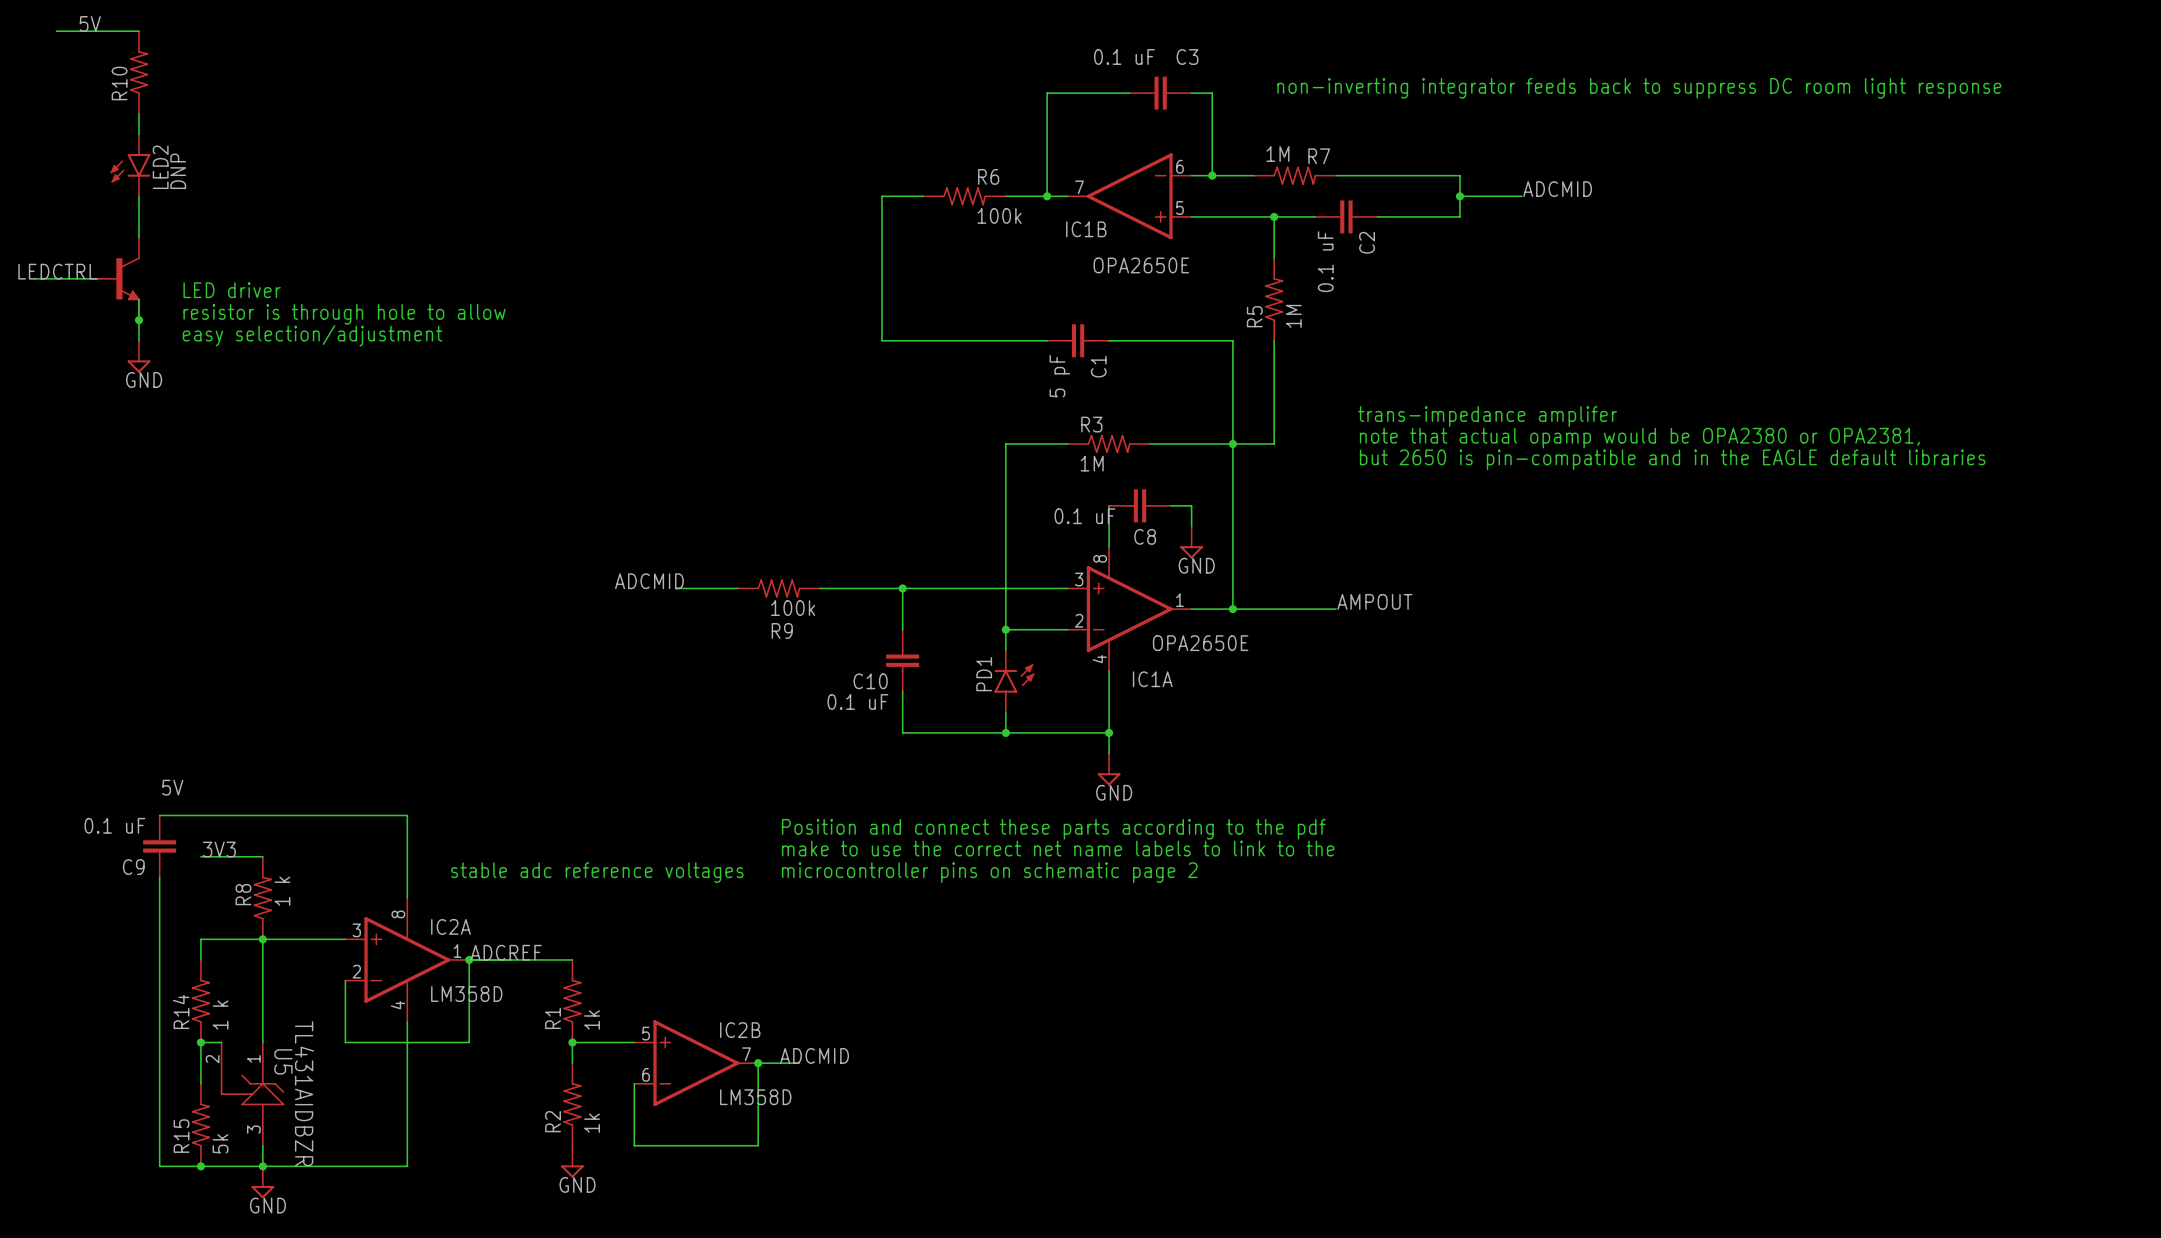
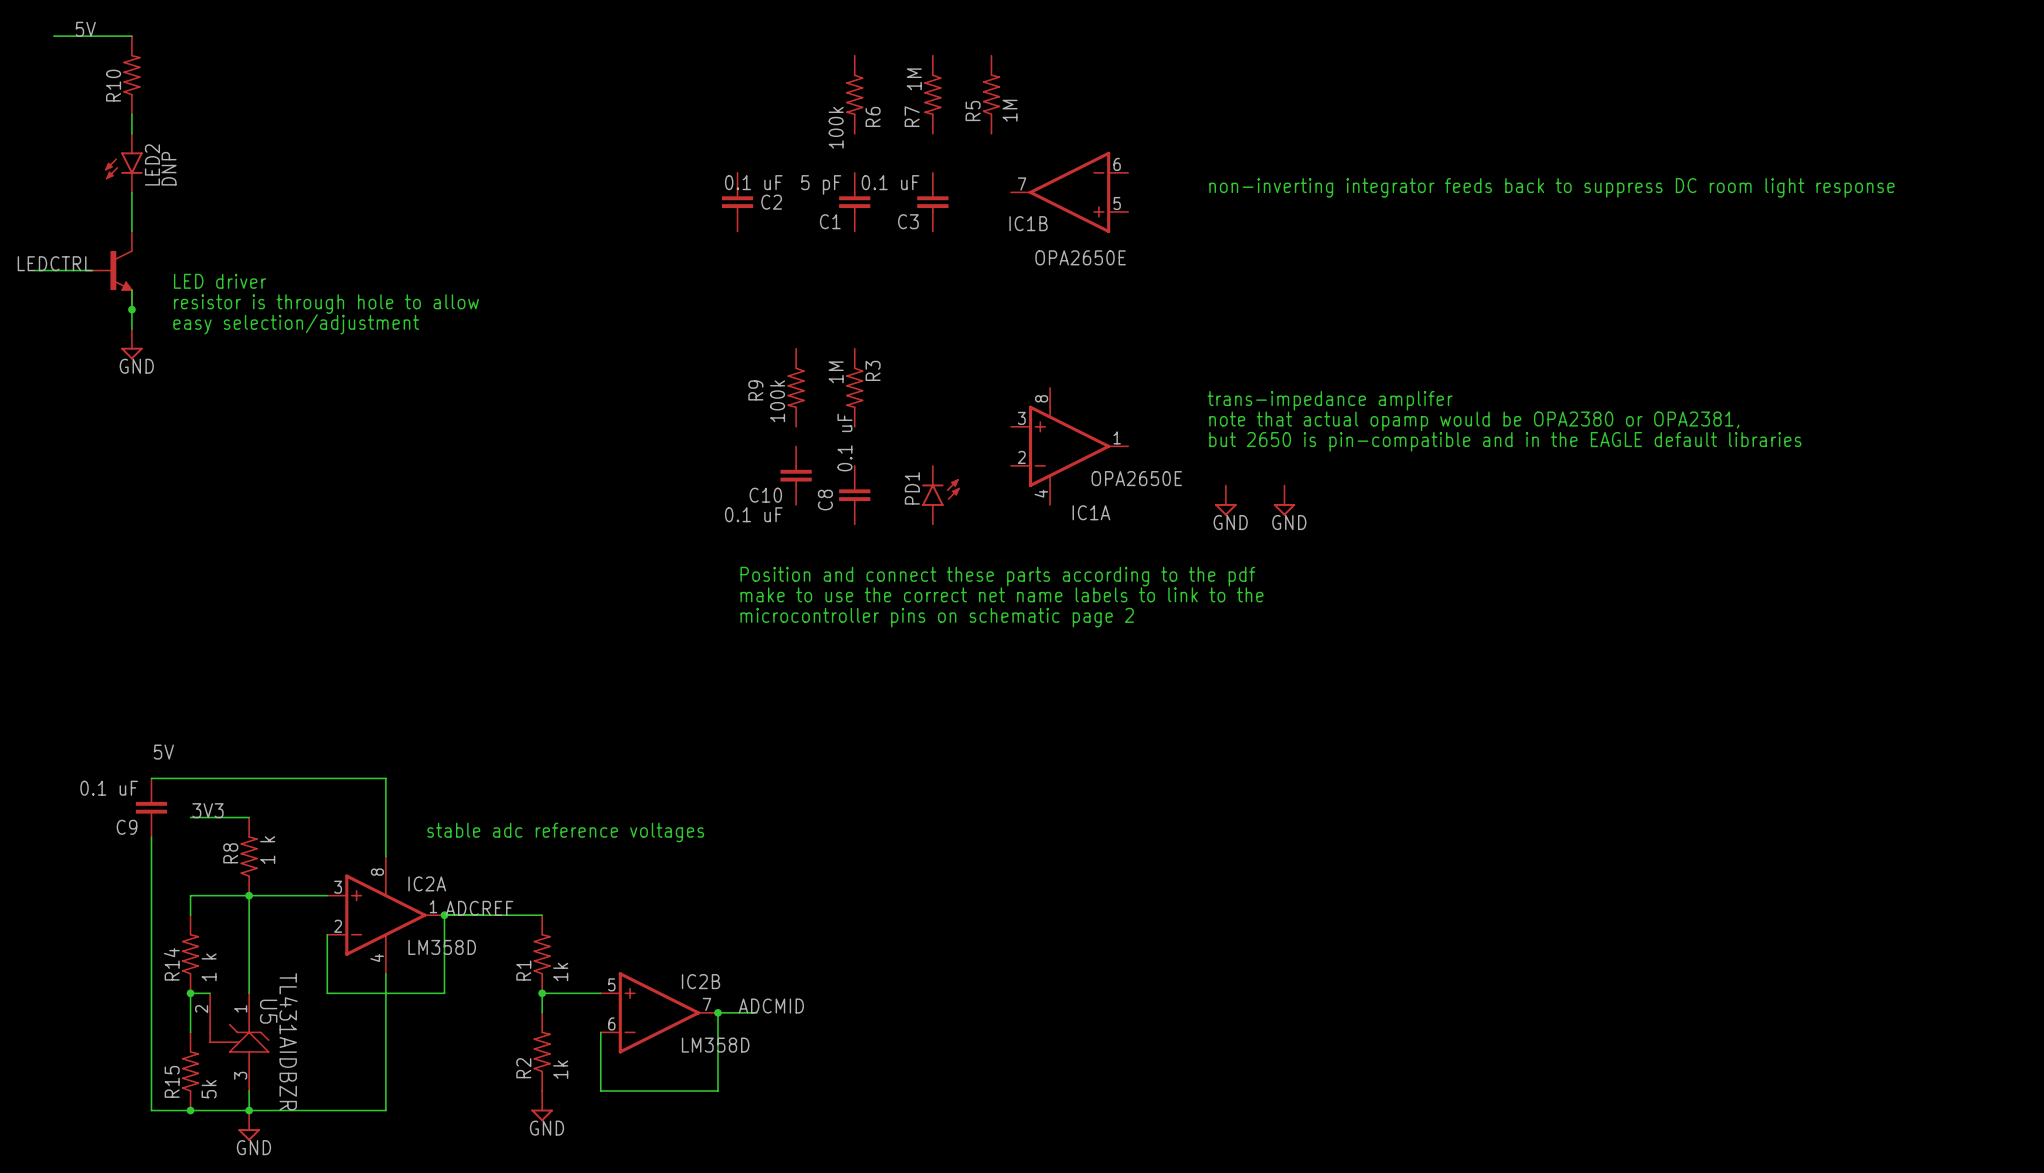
C3 value position: 0.1 uF (1124, 56) -> 0.1 uF (890, 182)
C3 name position: C3 (1187, 56) -> C3 (908, 221)
text position: non-inverting integrator feeds back to suppress DC room light response (1639, 88) -> non-inverting integrator feeds back to suppress DC room light response (1551, 187)
wire: (1129, 93) (1047, 93) (1047, 196) -> none
C3 rotation: 0° (1160, 93) -> 90° clockwise (932, 202)
C3 position: (1160, 93) -> (932, 202)
wire: (1191, 93) (1212, 93) (1212, 175) -> none
R7 name position: R7 (1319, 156) -> R7 (912, 116)
wire: (1191, 175) (1253, 175) -> none
junction: (1212, 175) -> none
R7 rotation: 0° (1294, 175) -> 90° clockwise (932, 94)
R7 position: (1294, 175) -> (932, 94)
wire: (1336, 175) (1459, 175) (1459, 216) (1377, 216) -> none
label: ADCMID (1557, 189) -> none
wire: (923, 196) (882, 196) (882, 340) (1047, 340) -> none
R6 rotation: 0° (964, 196) -> 90° clockwise (854, 94)
R6 position: (964, 196) -> (854, 94)
wire: (1005, 196) (1067, 196) -> none
junction: (1047, 196) -> none
wire: (1459, 196) (1521, 196) -> none
junction: (1459, 196) -> none
wire: (1191, 216) (1315, 216) -> none
wire: (1274, 216) (1274, 258) -> none
junction: (1274, 216) -> none
C2 rotation: 0° (1346, 216) -> 90° clockwise (737, 202)
C2 position: (1346, 216) -> (737, 202)
C2 name position: C2 (1367, 242) -> C2 (771, 202)
C2 value position: 0.1 uF (1325, 261) -> 0.1 uF (753, 182)
R5 position: (1274, 299) -> (991, 94)
C1 rotation: 0° (1078, 340) -> 90° clockwise (854, 202)
C1 position: (1078, 340) -> (854, 202)
wire: (1109, 340) (1232, 340) (1232, 609) -> none
wire: (1274, 340) (1274, 443) (1150, 443) -> none
text position: trans-impedance amplifer (1487, 416) -> trans-impedance amplifer (1330, 400)
text position: note that actual opamp would be OPA2380 or OPA2381, (1639, 438) -> note that actual opamp would be OPA2380 or OPA2381, (1474, 421)
wire: (1067, 443) (1005, 443) (1005, 650) -> none
R3 rotation: 0° (1109, 443) -> 90° clockwise (854, 387)
R3 position: (1109, 443) -> (854, 387)
junction: (1232, 443) -> none
text position: but 2650 is pin-compatible and in the EAGLE default libraries (1672, 459) -> but 2650 is pin-compatible and in the EAGLE default libraries (1505, 441)
wire: (1109, 505) (1109, 547) -> none
C8 rotation: 0° (1140, 505) -> 90° clockwise (854, 495)
C8 position: (1140, 505) -> (854, 495)
wire: (1170, 505) (1191, 505) (1191, 526) -> none
power symbol: none -> GND (1225, 500)
power symbol: none -> GND (1284, 500)
power symbol: GND (1191, 542) -> none
label: ADCMID (649, 581) -> none
wire: (675, 588) (737, 588) -> none
R9 rotation: 0° (778, 588) -> 90° clockwise (796, 387)
R9 position: (778, 588) -> (796, 387)
wire: (820, 588) (1067, 588) -> none
wire: (902, 588) (902, 629) -> none
junction: (902, 588) -> none
label: AMPOUT (1374, 601) -> none
text: none -> Position and connect these parts according to the pdf (997, 576)
IC1A position: (1129, 609) -> (1069, 446)
wire: (1191, 609) (1336, 609) -> none
junction: (1232, 609) -> none
text: none -> make to use the correct net name labels to link to the (1001, 594)
wire: (1005, 629) (1067, 629) -> none
junction: (1005, 629) -> none
text: none -> microcontroller pins on schematic page 2 (937, 617)
C10 position: (902, 660) -> (796, 475)
wire: (1109, 671) (1109, 753) -> none
PD1 position: (1014, 681) -> (940, 495)
wire: (902, 691) (902, 732) (1109, 732) -> none
wire: (1005, 712) (1005, 732) -> none
junction: (1005, 732) -> none
junction: (1109, 732) -> none
power symbol: GND (1109, 769) -> none
text: Position and connect these parts according to the pdf (1053, 829) -> none
text: make to use the correct net name labels to link to the (1058, 848) -> none
text: microcontroller pins on schematic page 2 (989, 872) -> none

